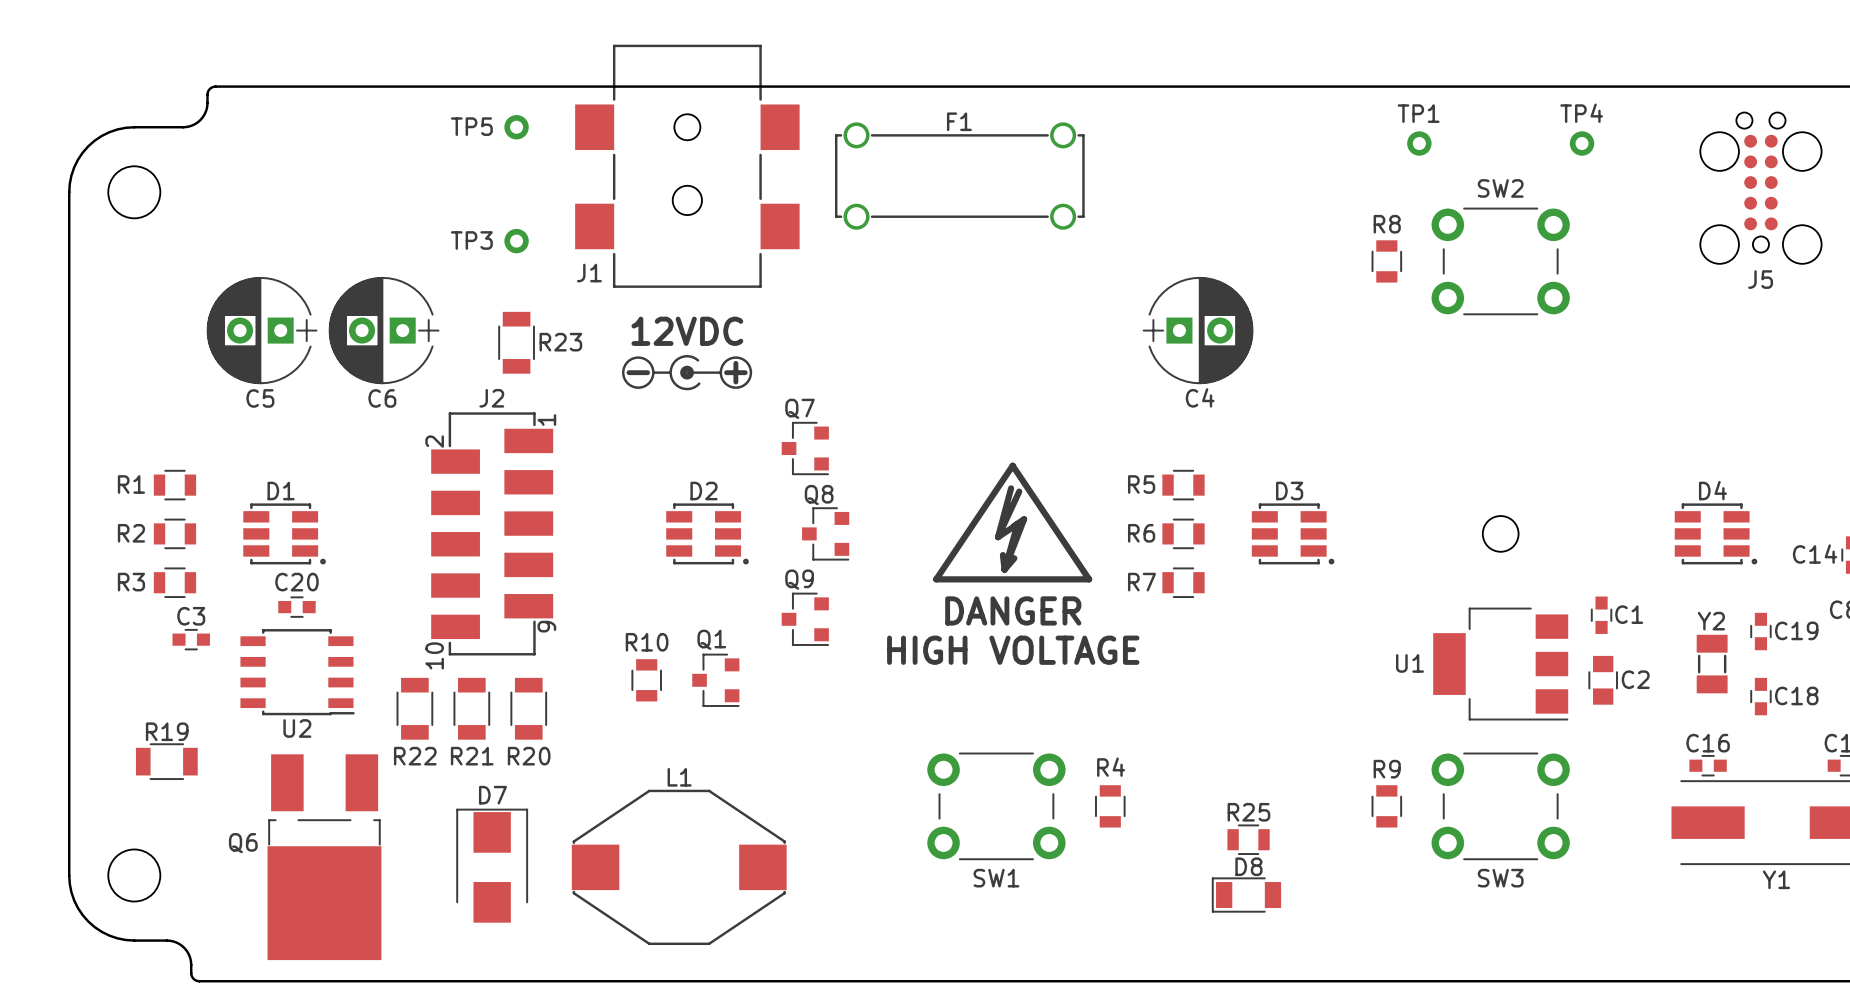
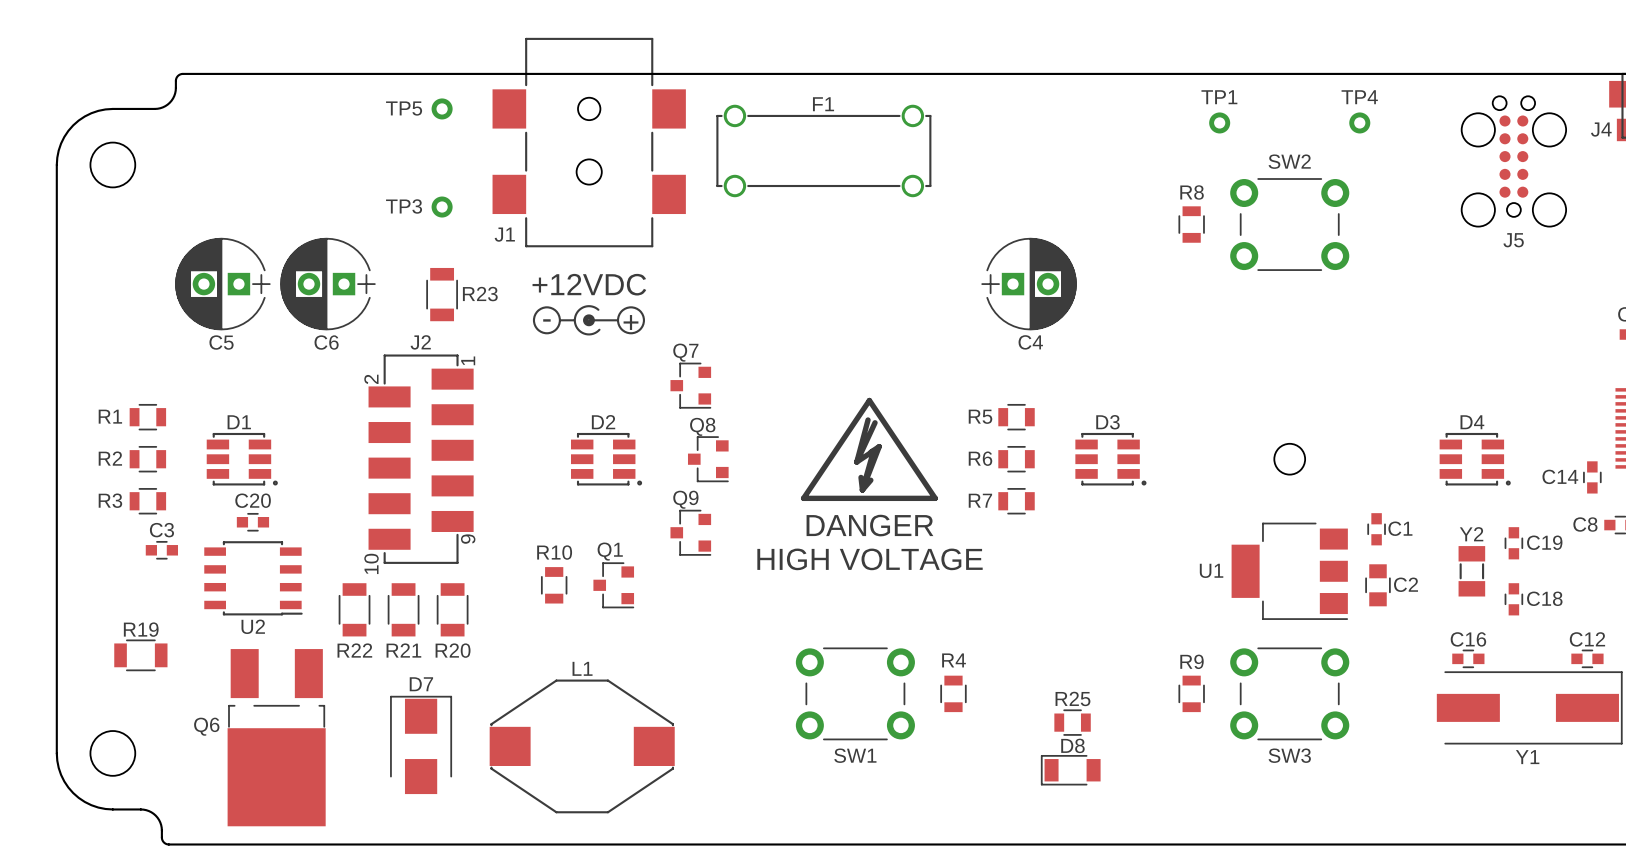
text: 12VDC (687, 331) -> +12VDC (589, 284)

